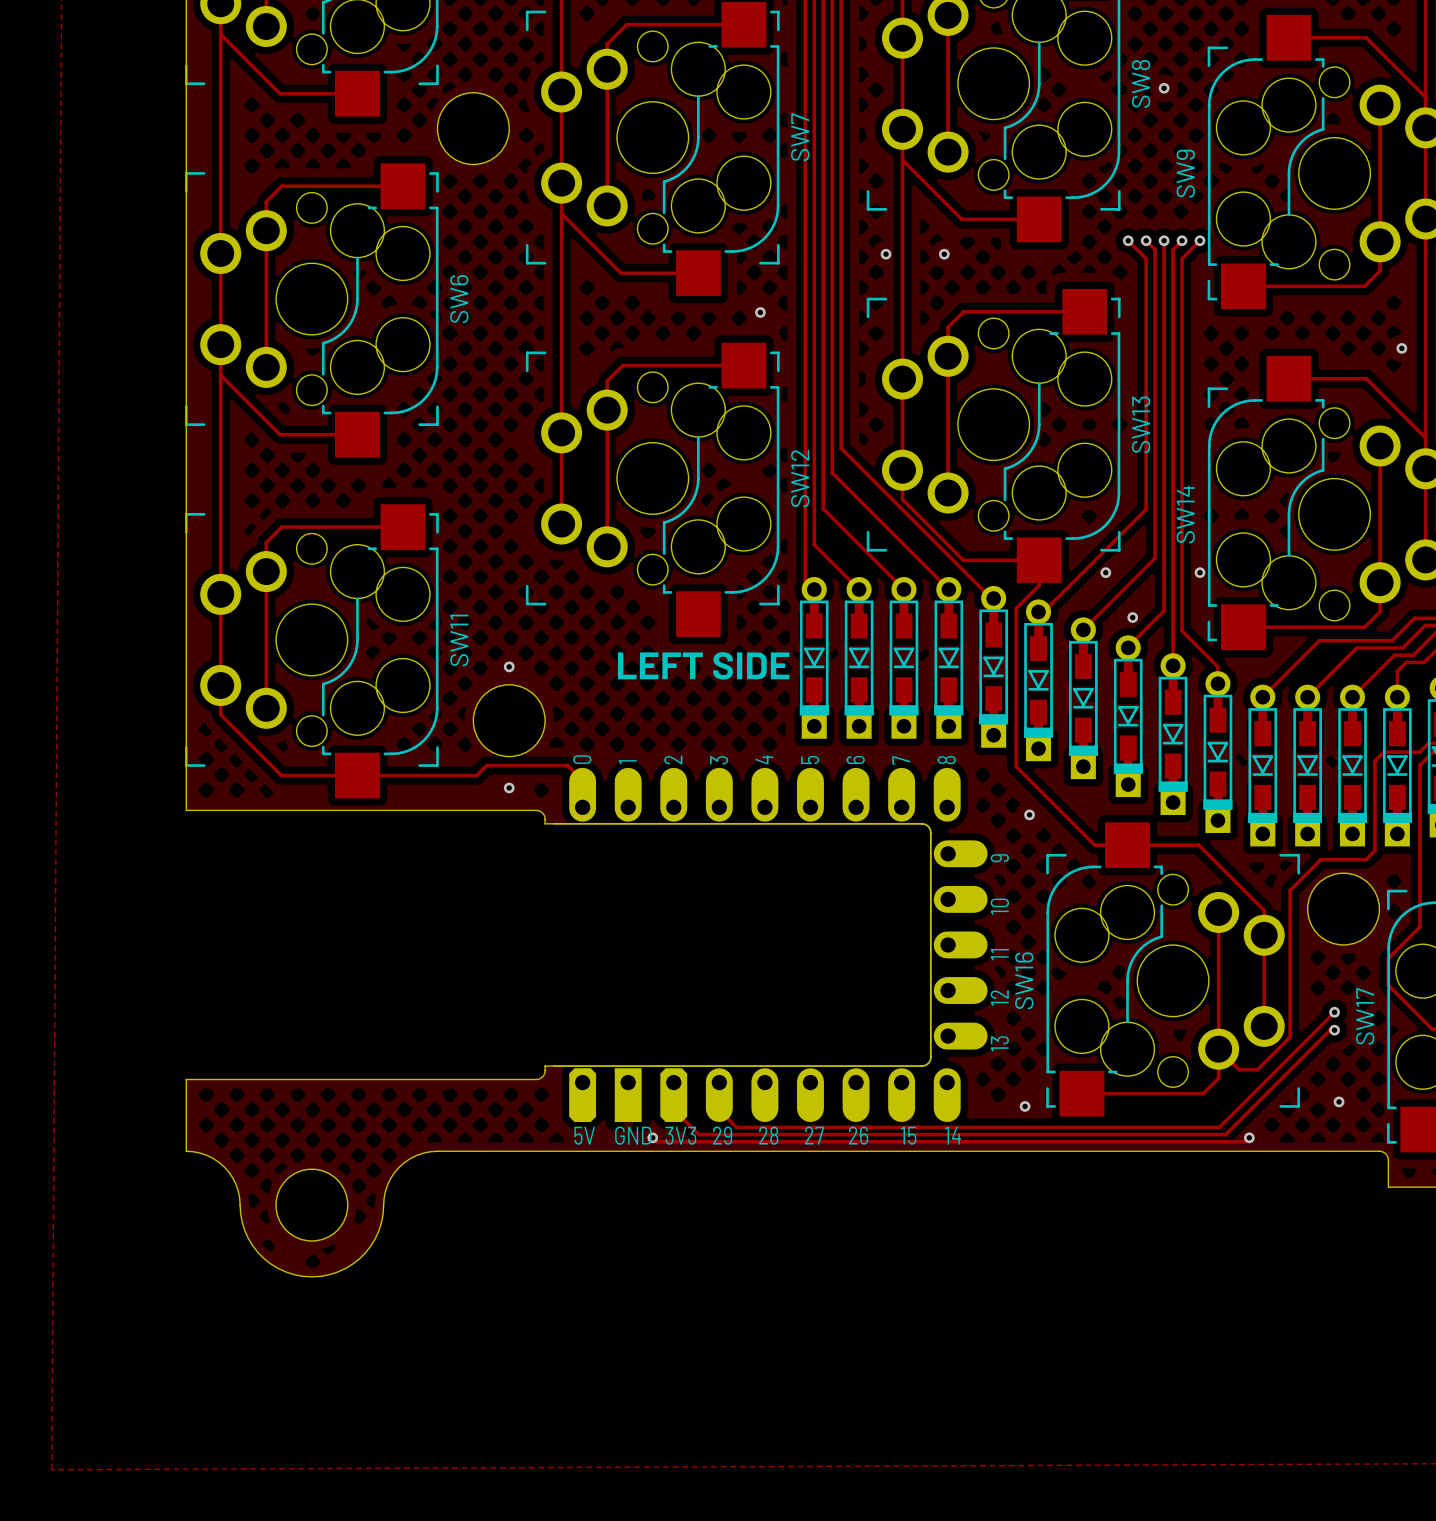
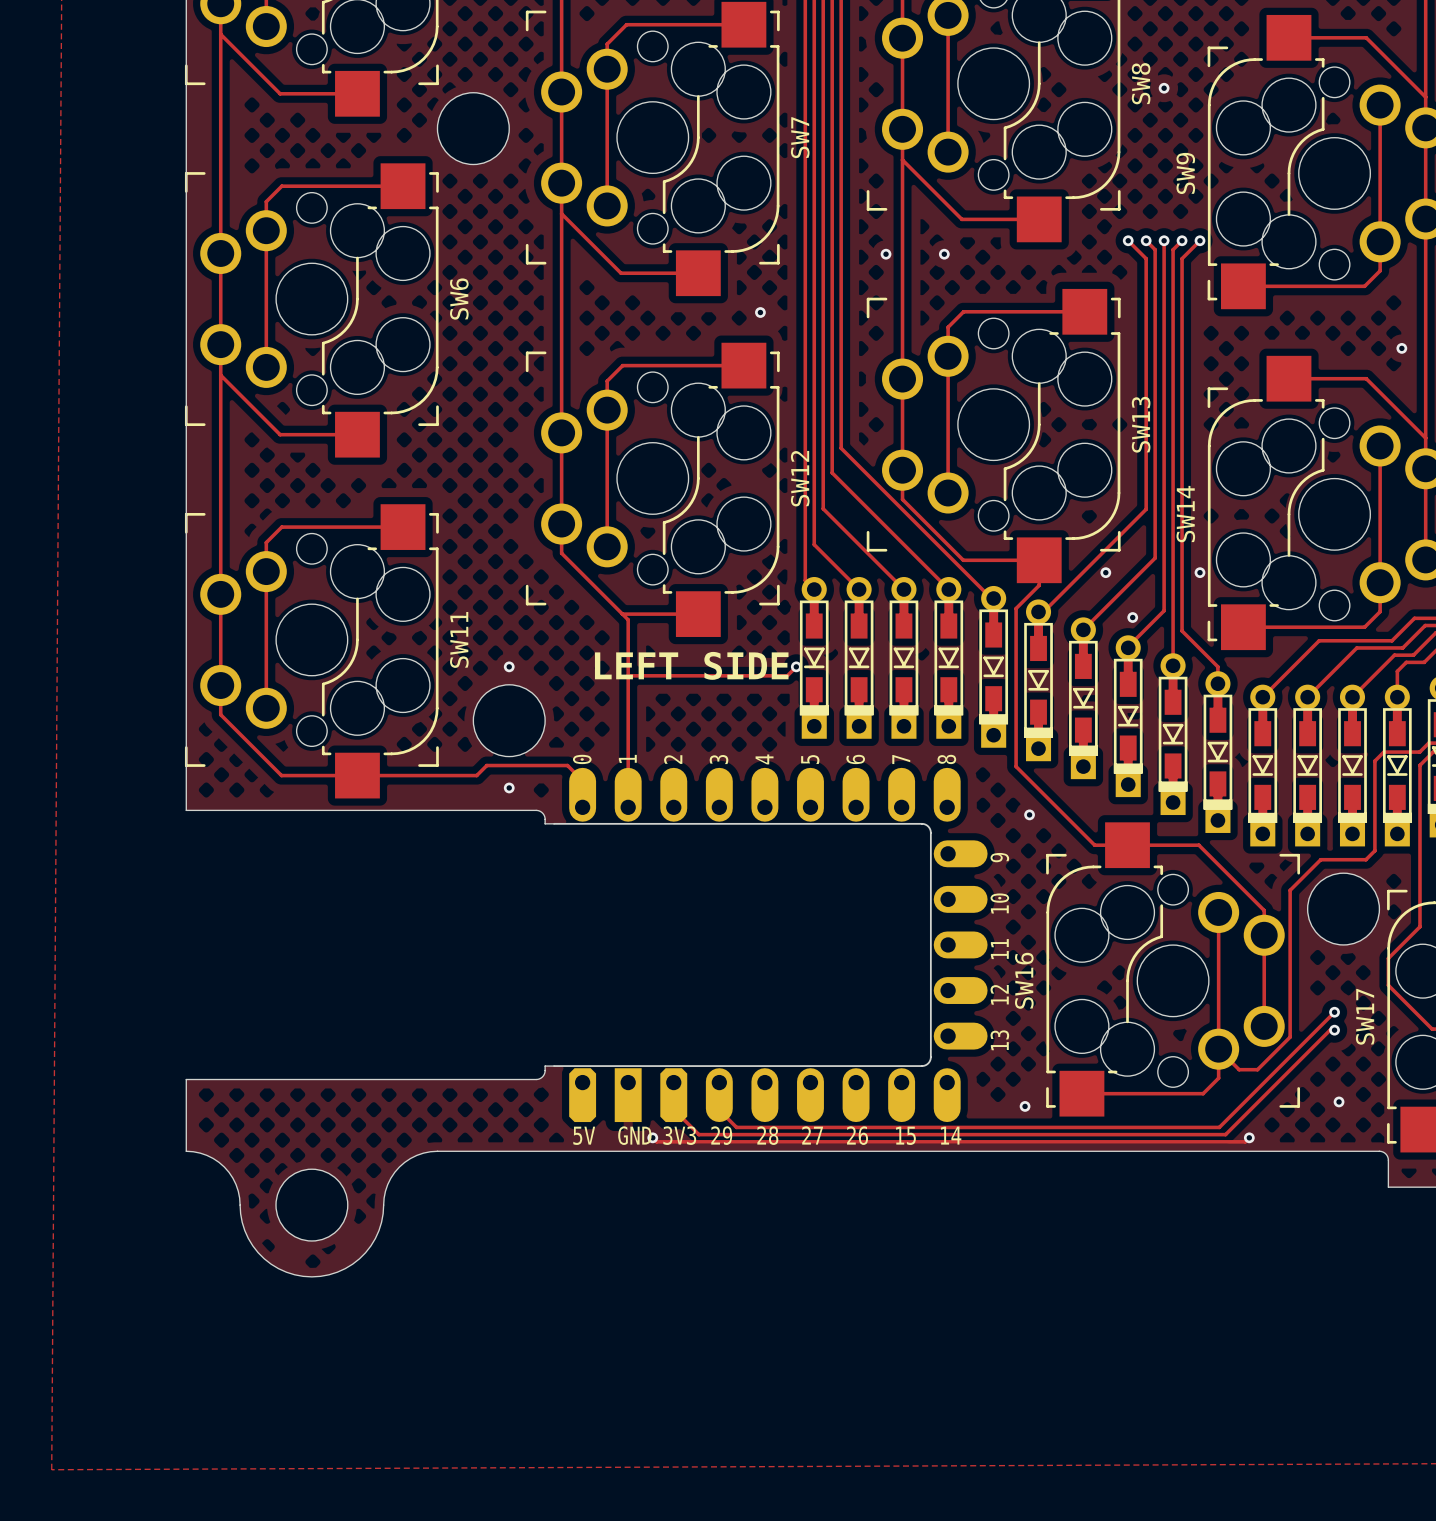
track: none -> (561, 524) (561, 553) (628, 619) (628, 807)
track: none -> (622, 614) (698, 614)
track: none -> (796, 666) (787, 675) (628, 675)
via: none -> (796, 666)

